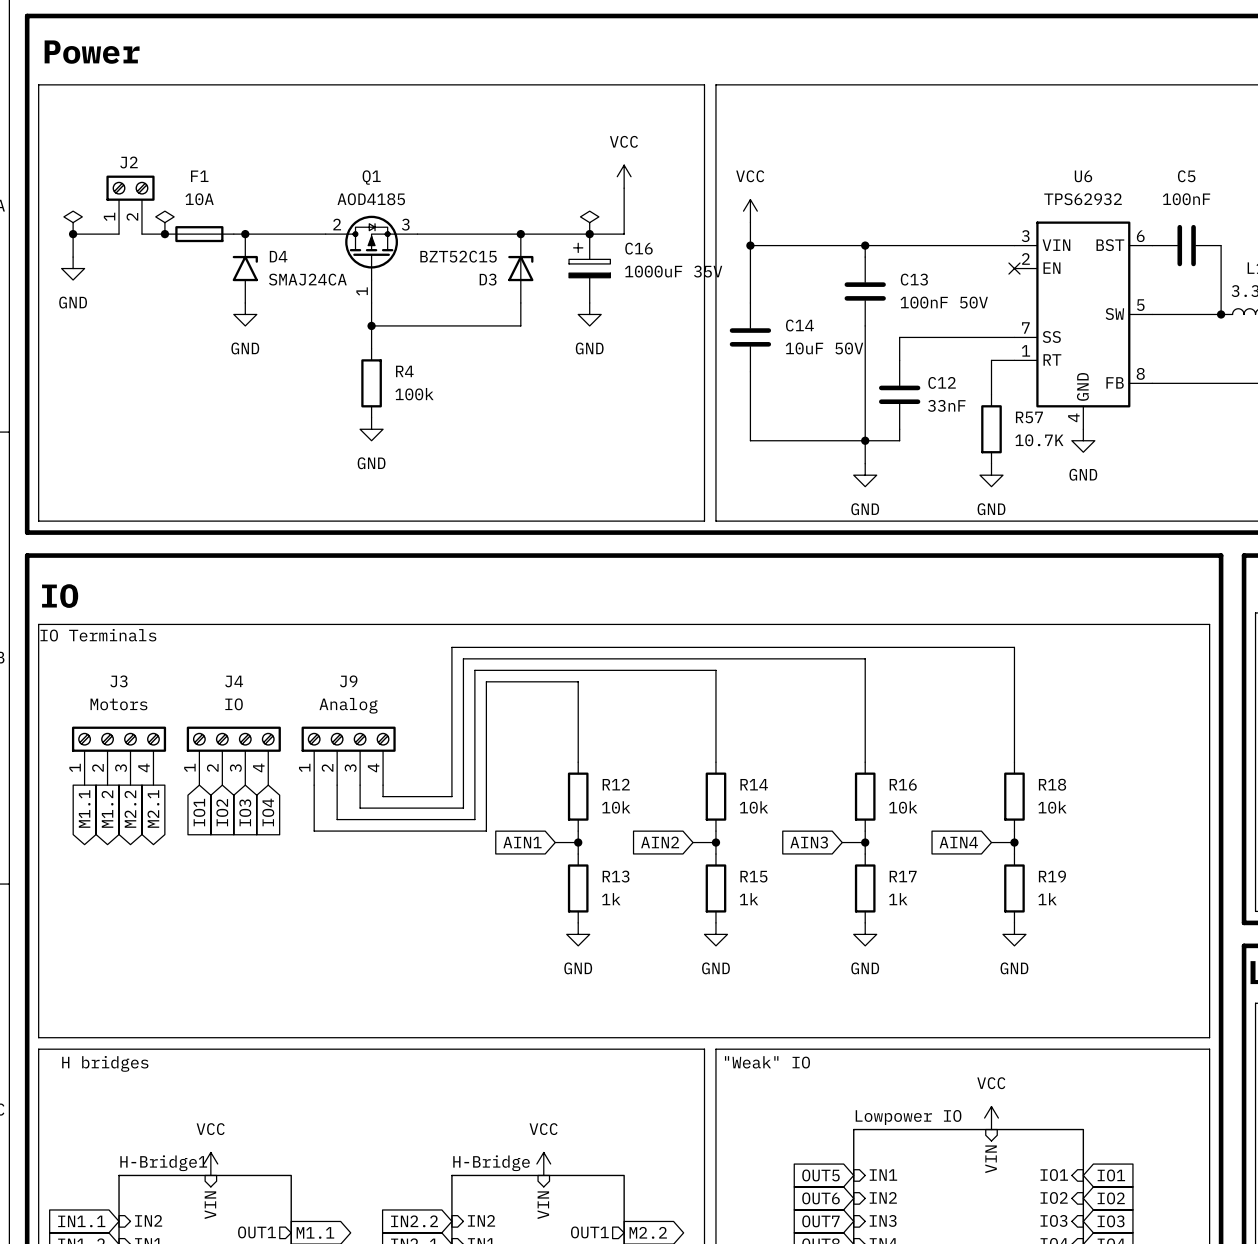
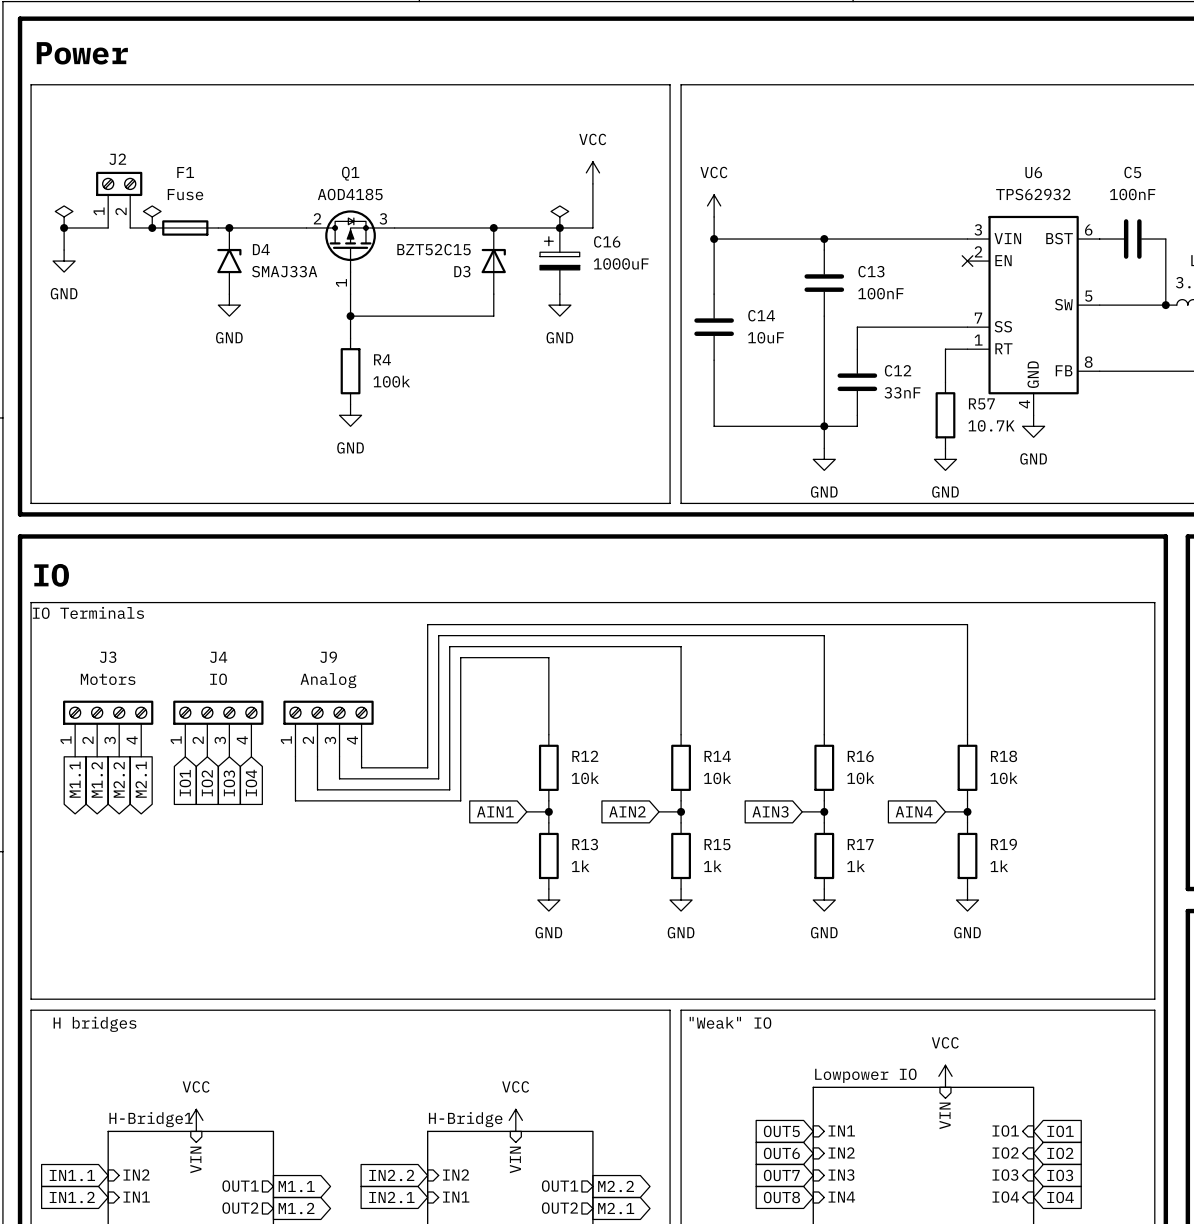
F1 value: 10A (199, 199) -> Fuse (185, 194)
C16 value: 1000uF 35V (673, 271) -> 1000uF (621, 263)
D4 value: SMAJ24CA (307, 279) -> SMAJ33A (284, 271)
C13 value: 100nF 50V (944, 302) -> 100nF (880, 293)
C14 value: 10uF 50V (824, 348) -> 10uF (765, 337)

